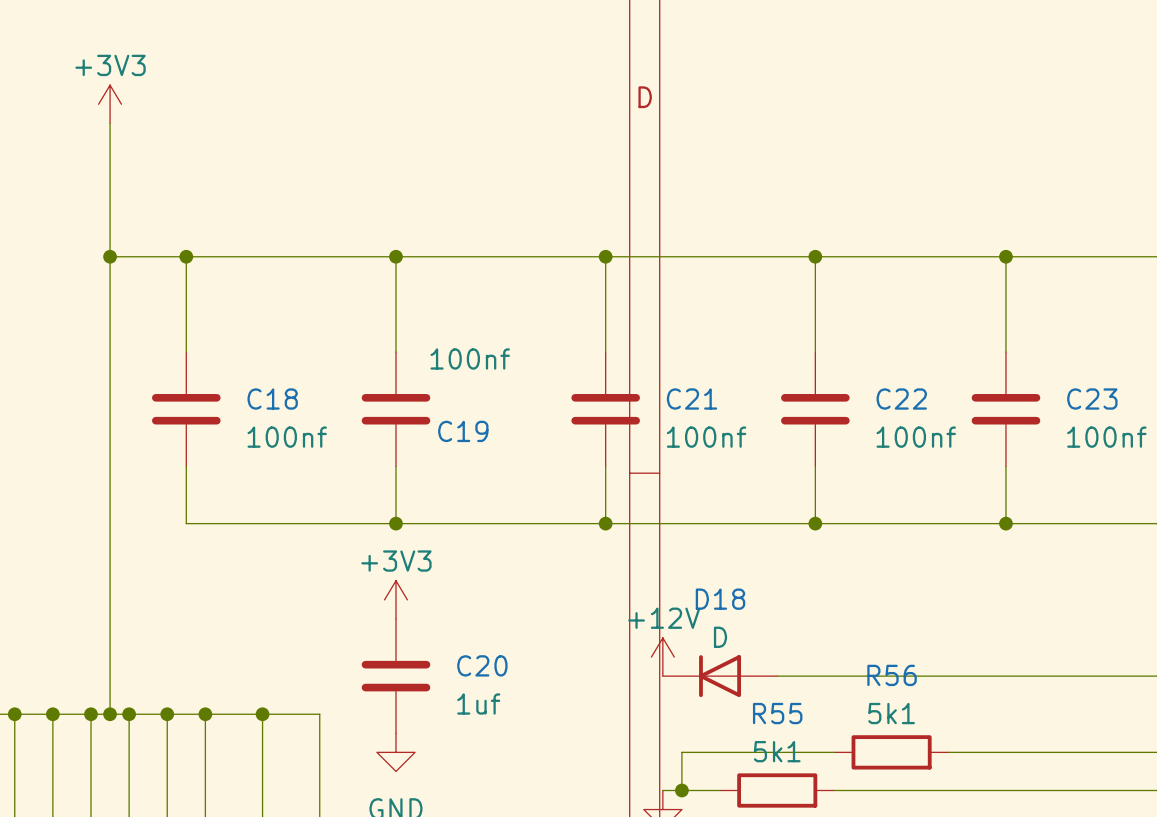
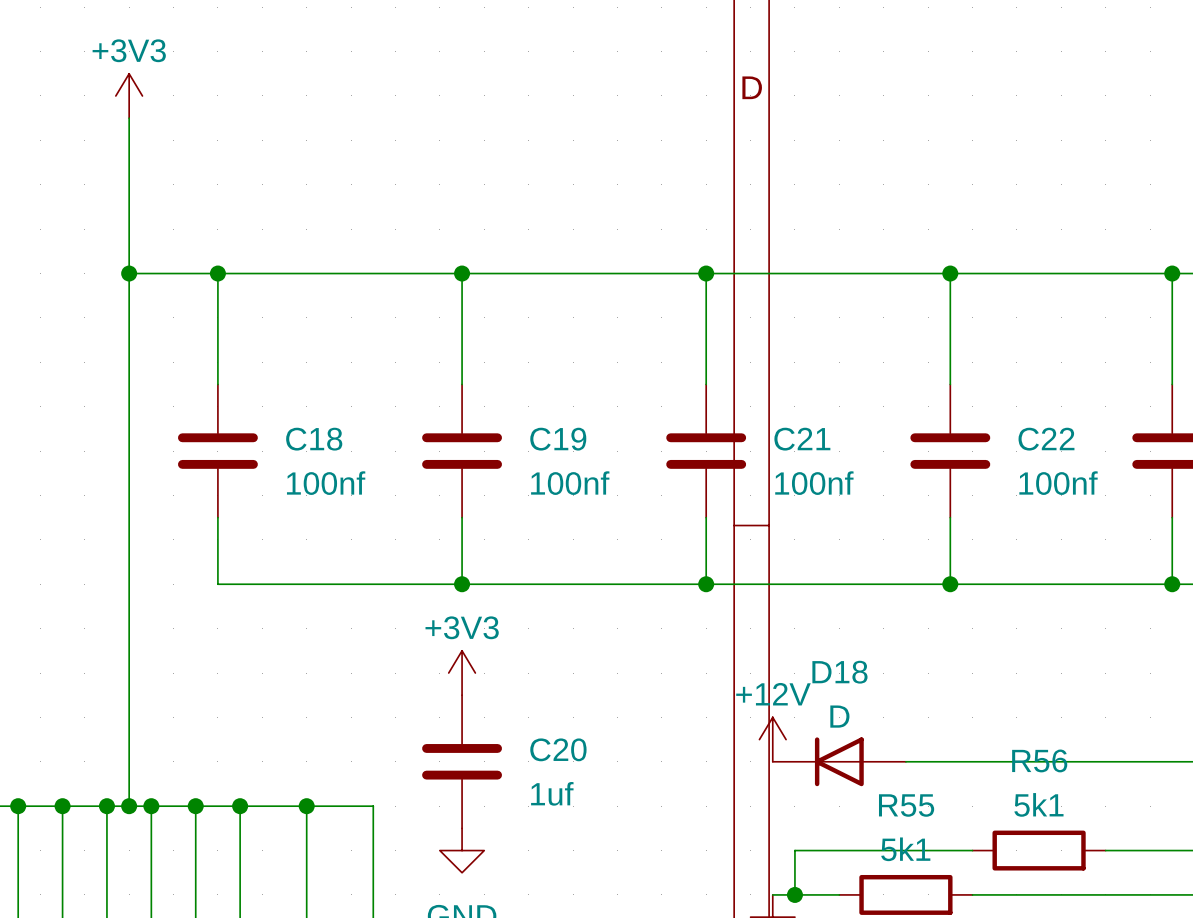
C19 value position: 100nf (470, 358) -> 100nf (570, 483)
C19 name position: C19 (463, 431) -> C19 (558, 439)

